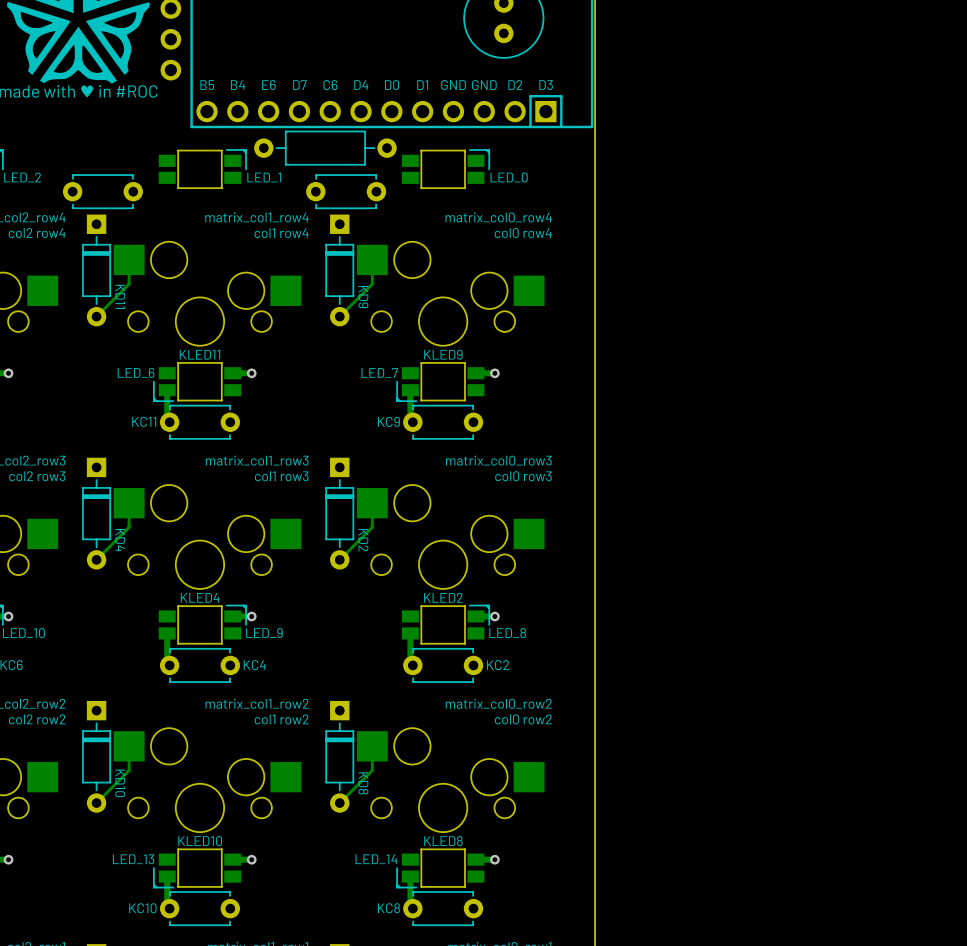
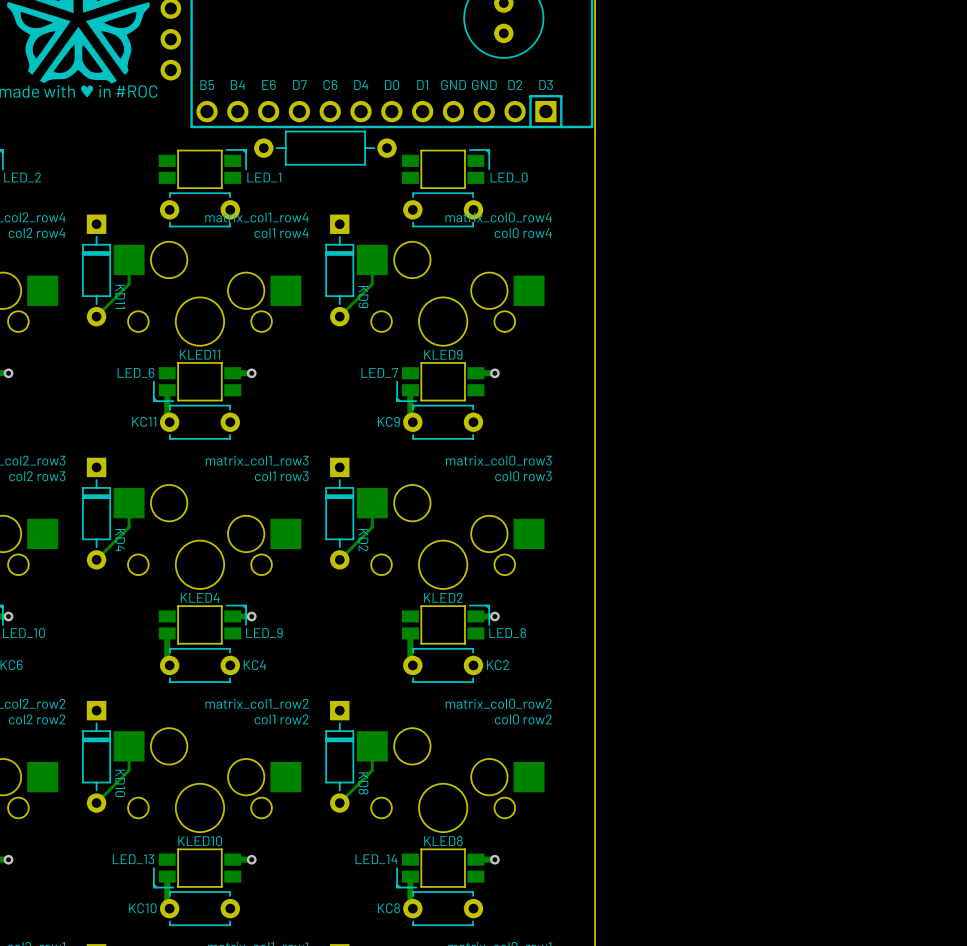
part: (102, 191) -> none
part: (346, 191) -> none
part: none -> (199, 209)
part: none -> (443, 209)

